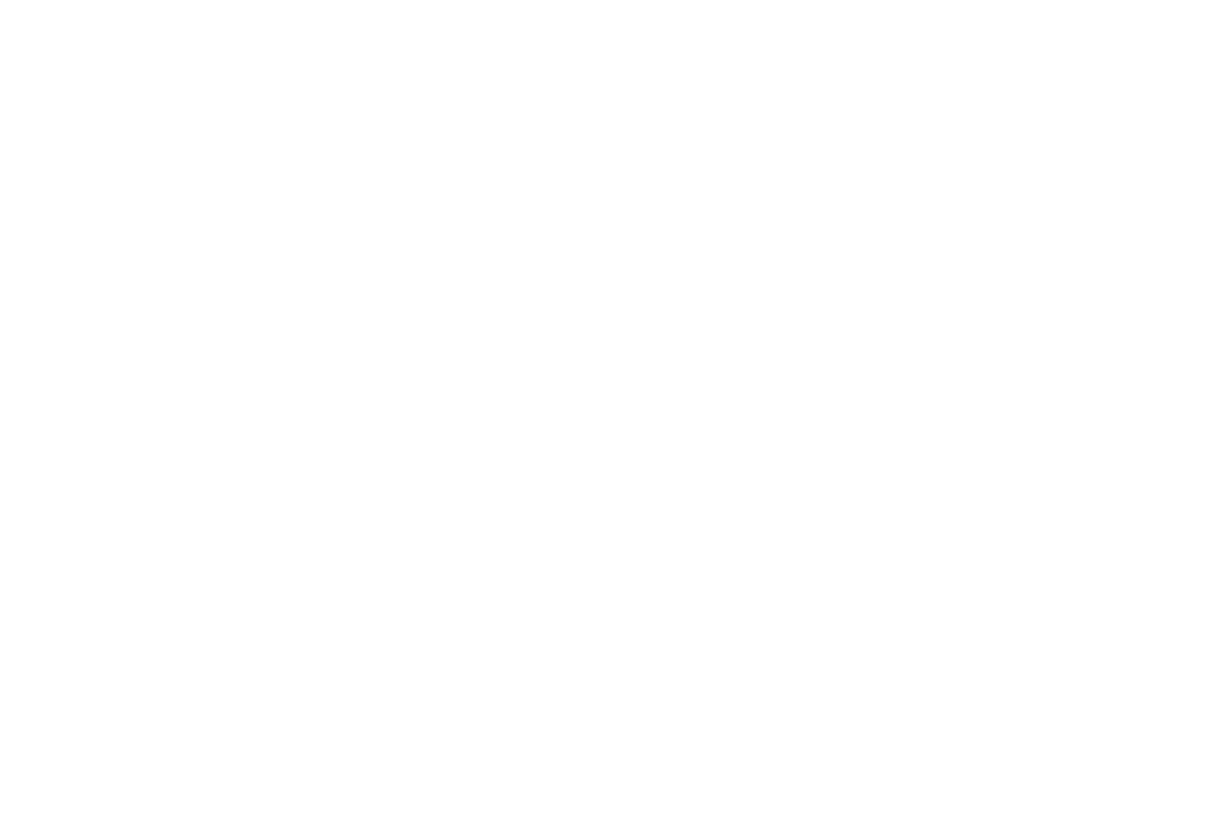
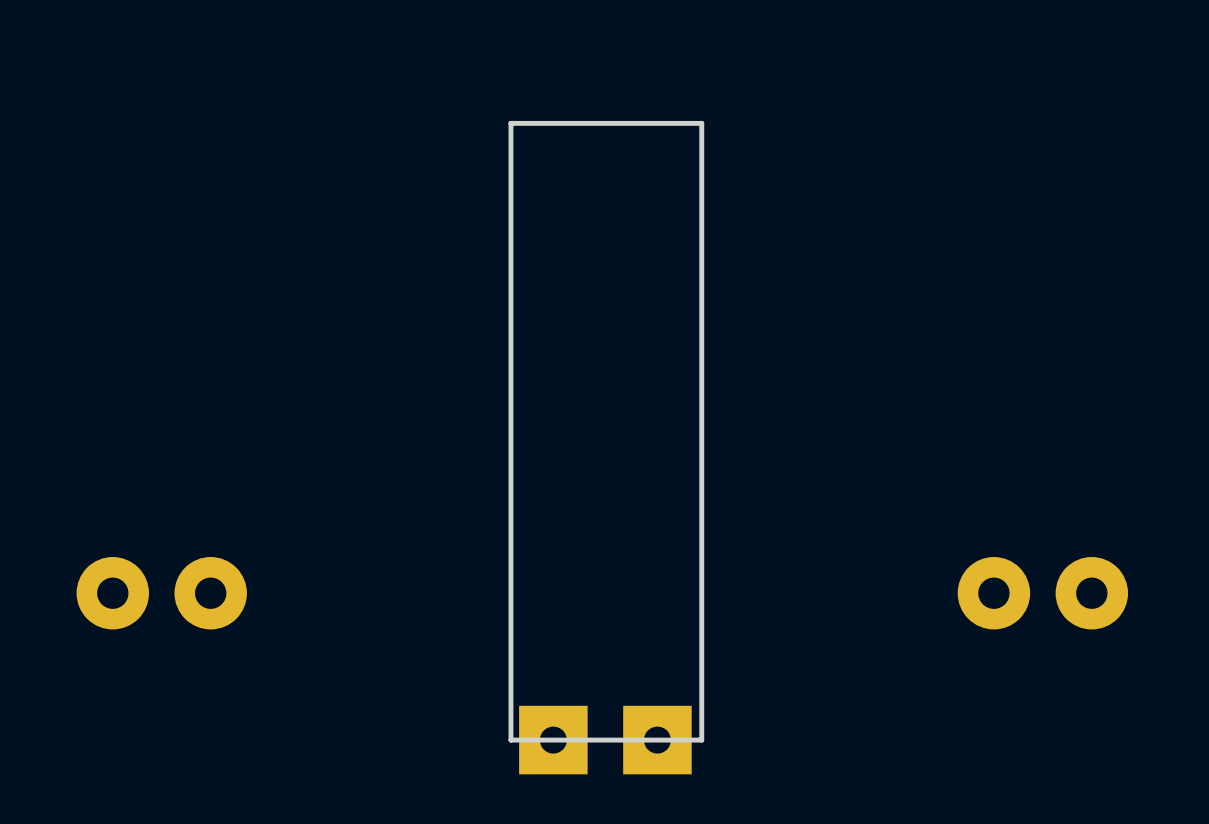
part: none -> (606, 447)
part: none -> (161, 593)
part: none -> (1042, 593)

